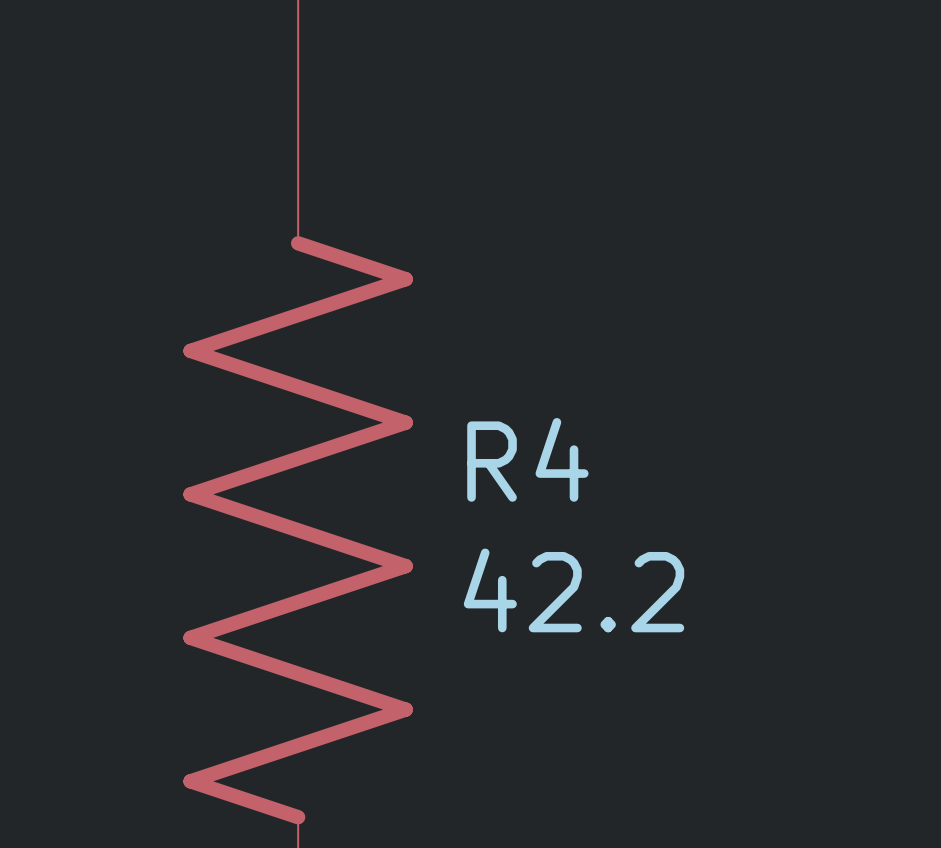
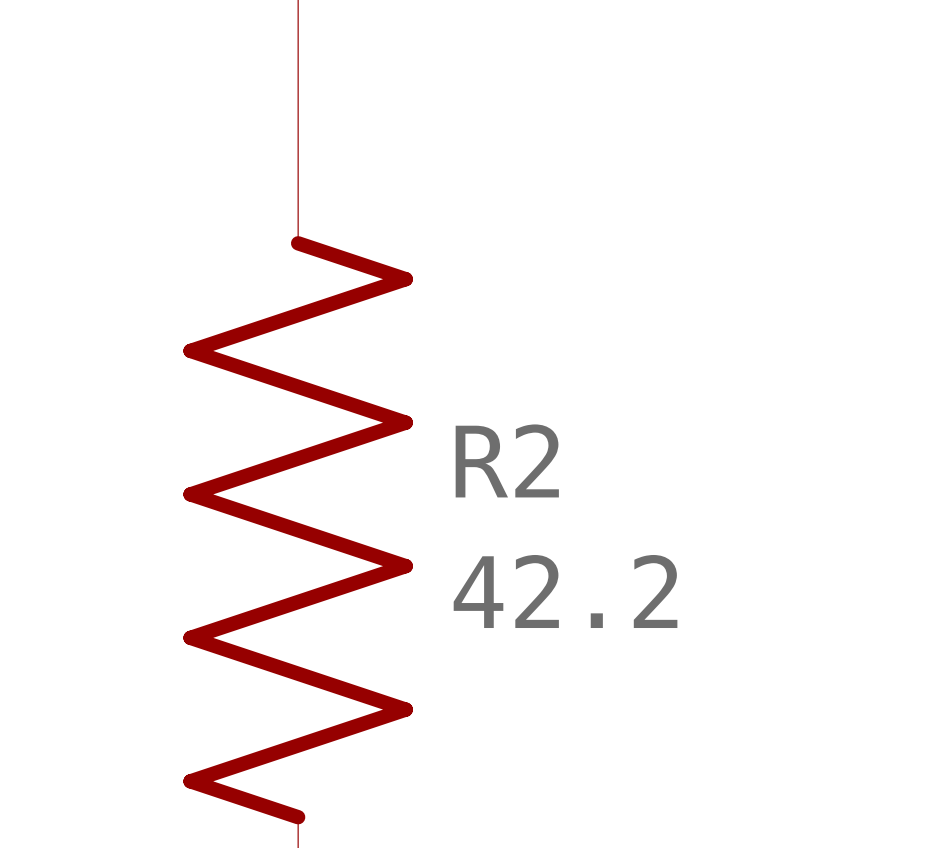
R4 name: R4 (527, 459) -> R2 (507, 460)

